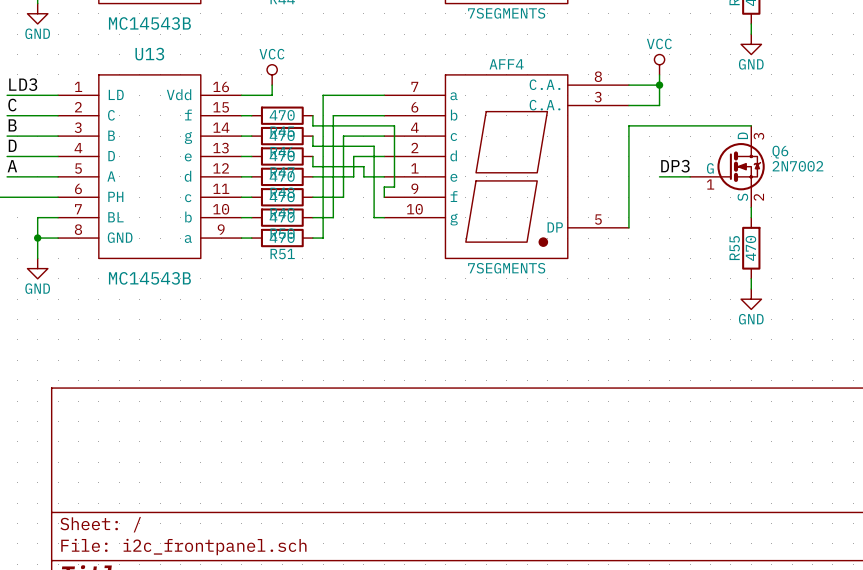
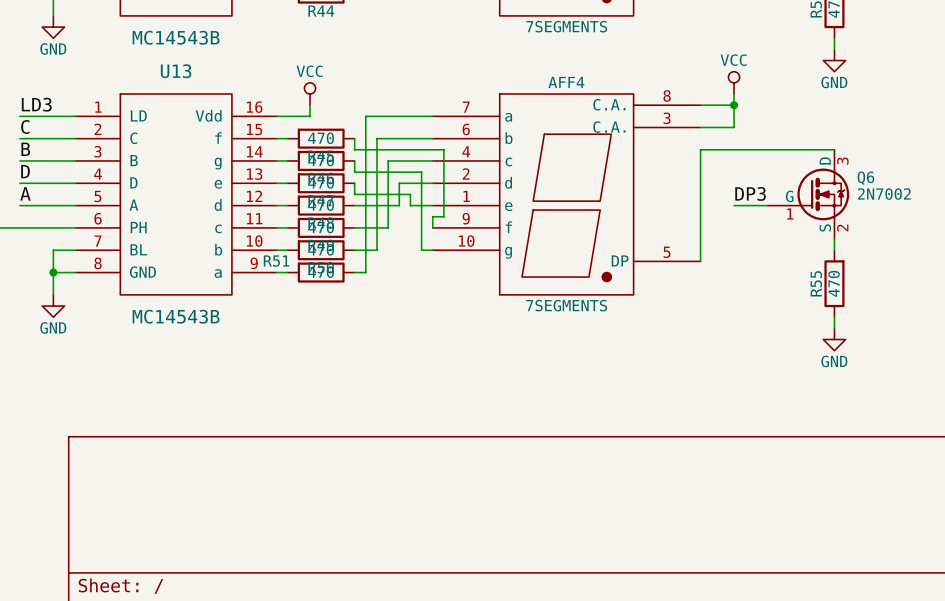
R51 name position: R51 (282, 254) -> R51 (276, 261)

